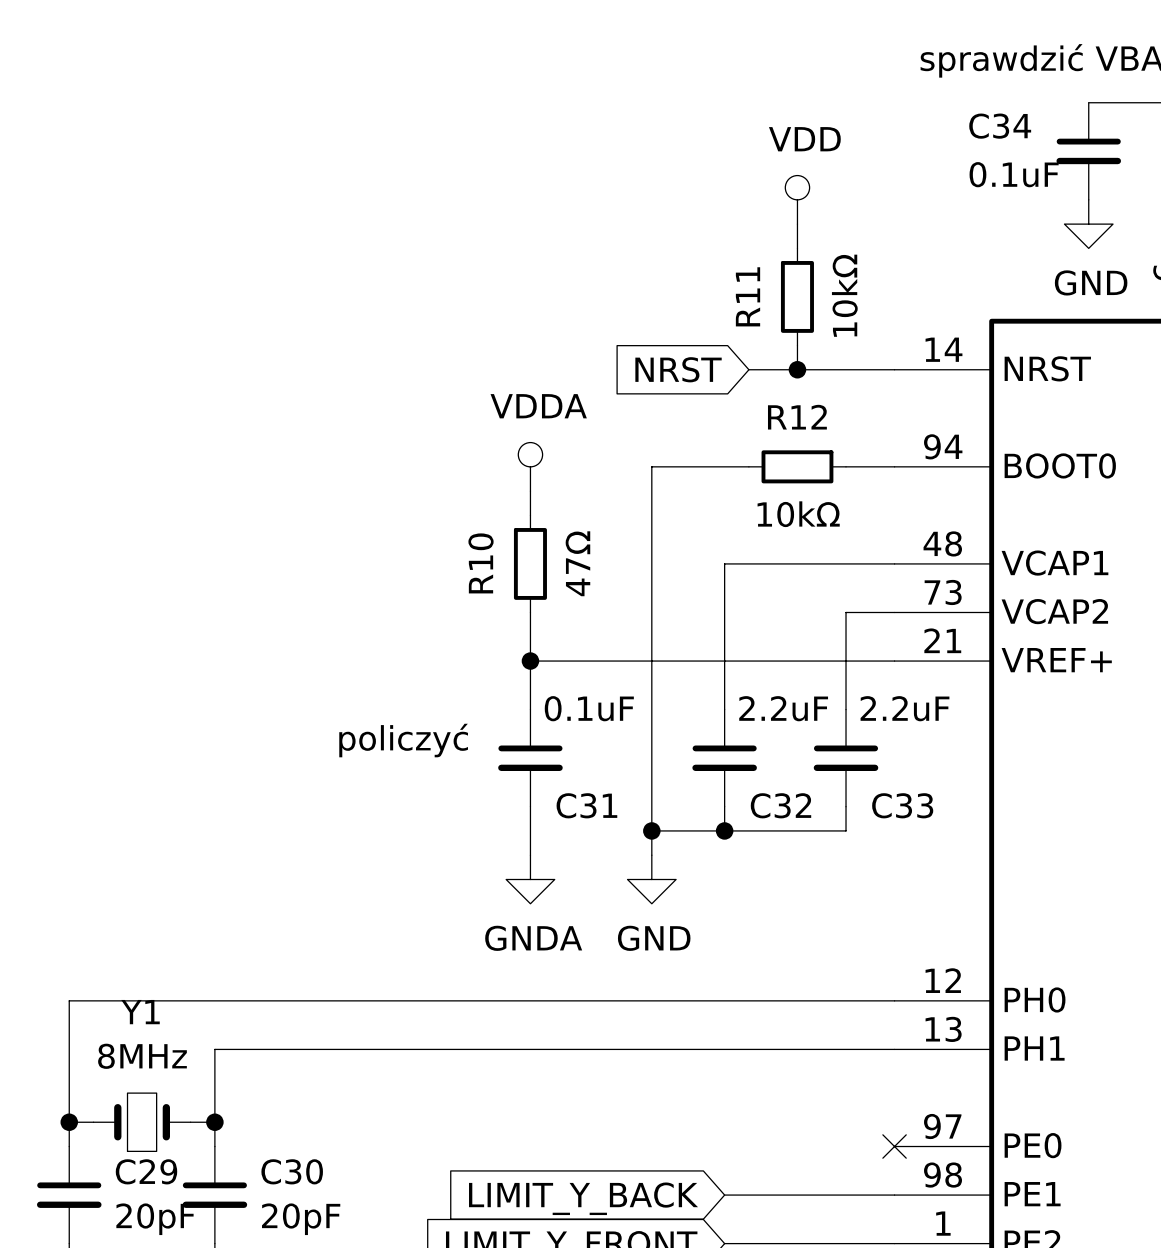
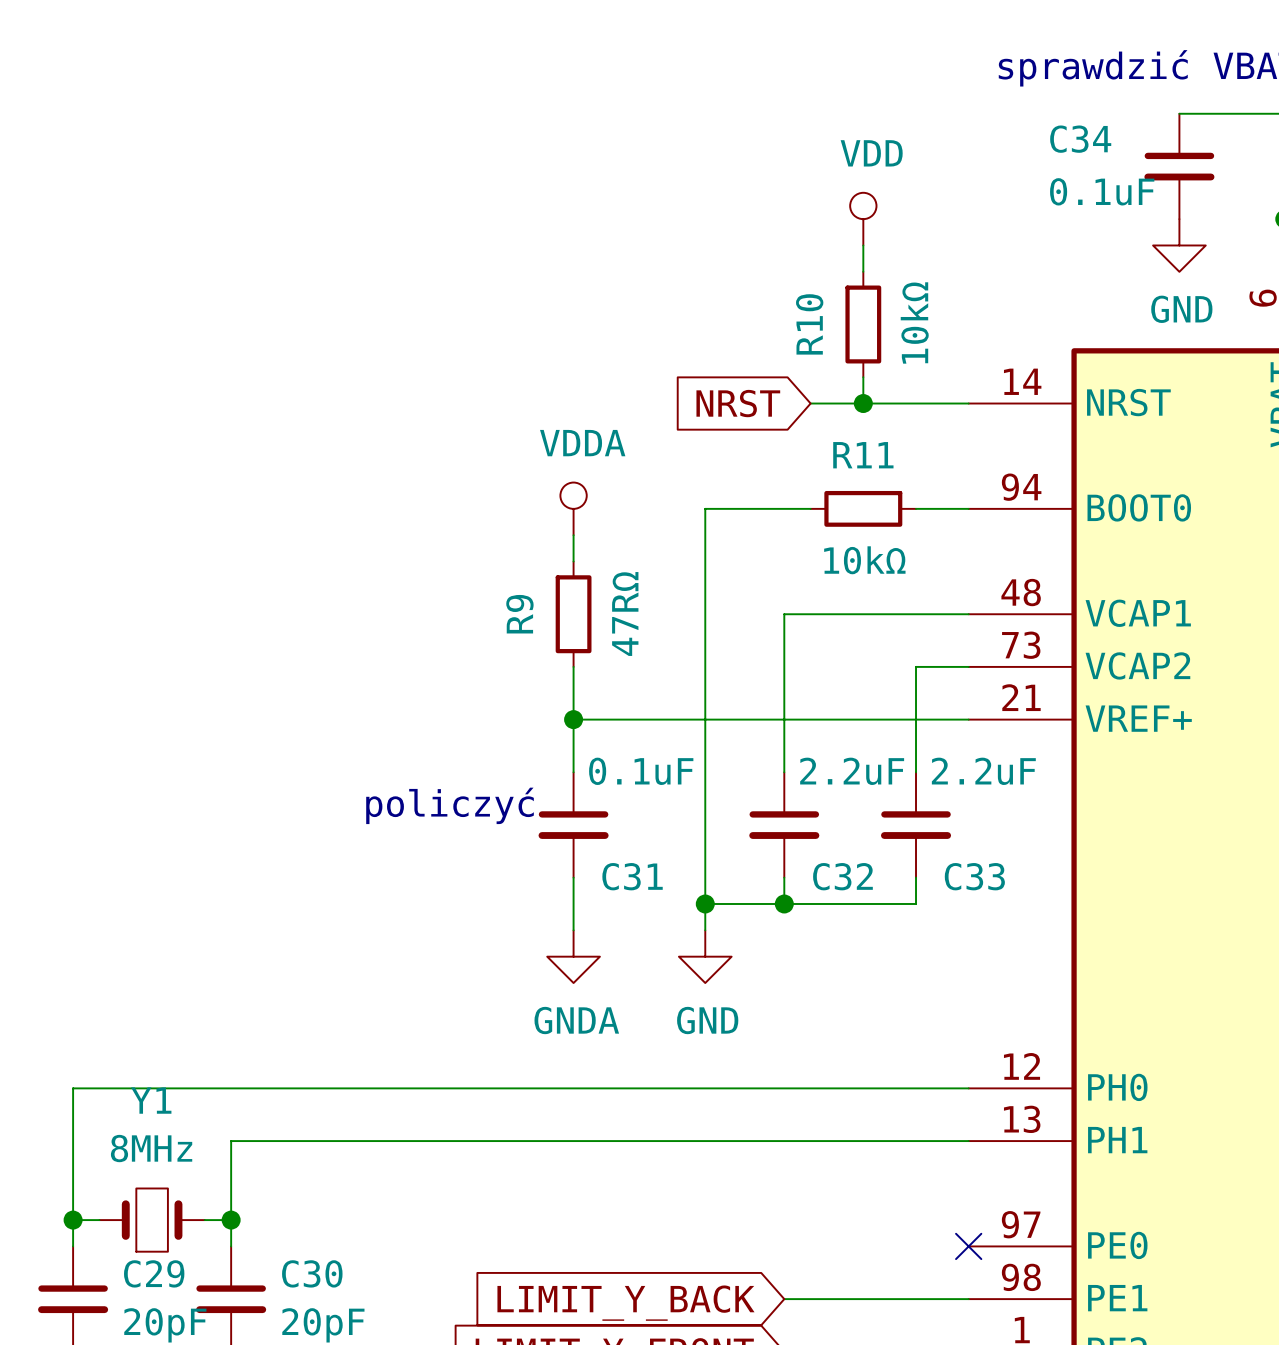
R11 name: R11 (748, 296) -> R10 (809, 324)
R12 name: R12 (797, 417) -> R11 (863, 455)
R10 name: R10 (481, 563) -> R9 (519, 614)
R10 value: 47Ω (577, 563) -> 47RΩ (625, 613)

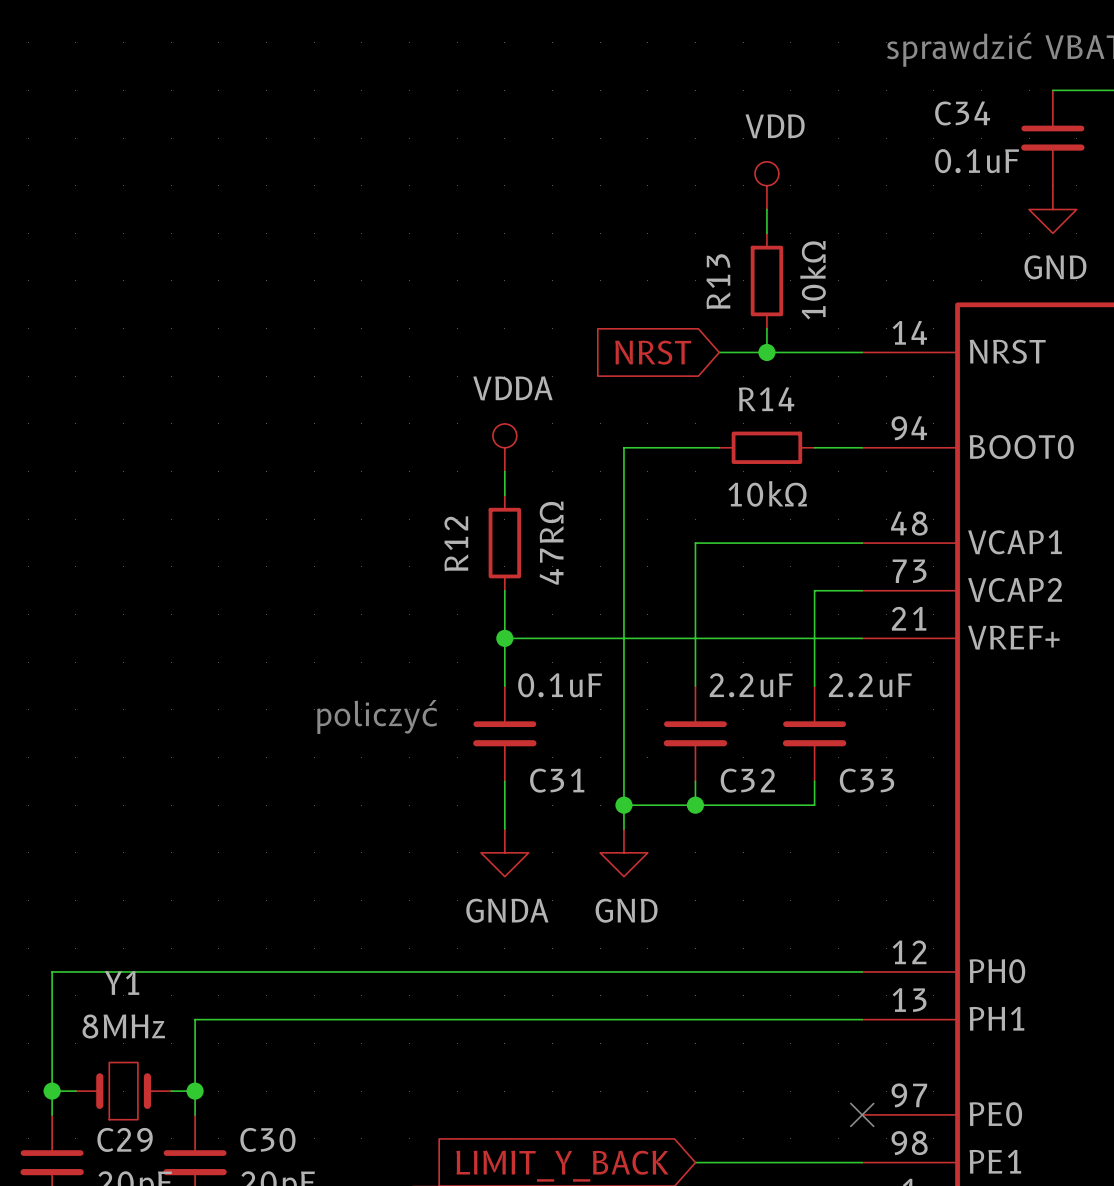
R10 name: R10 (809, 324) -> R13 (718, 281)
R11 name: R11 (863, 455) -> R14 (766, 399)
R9 name: R9 (519, 614) -> R12 (456, 543)

